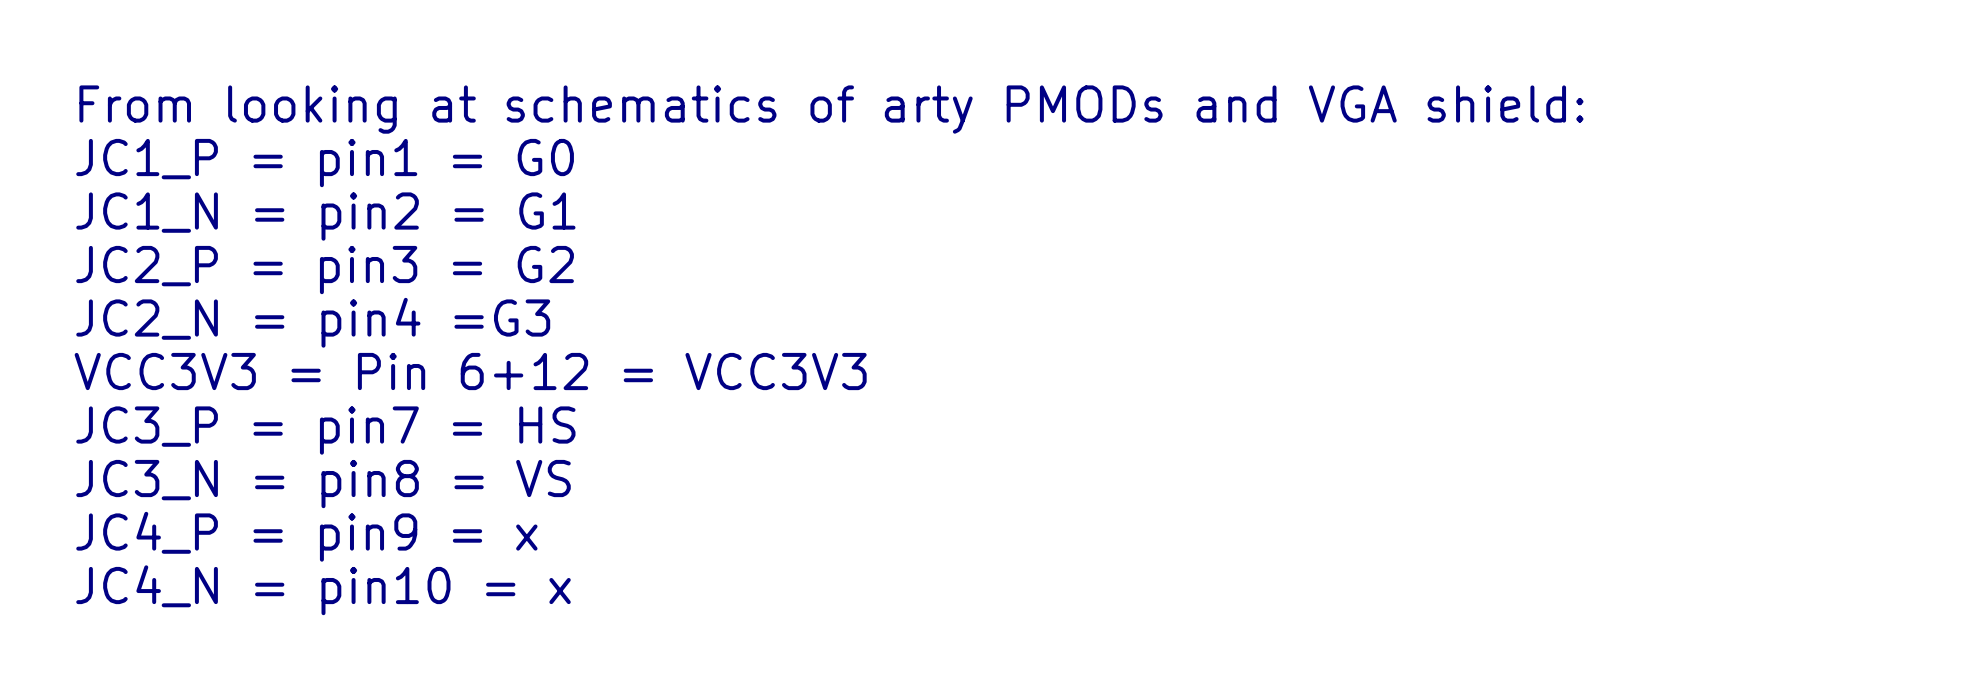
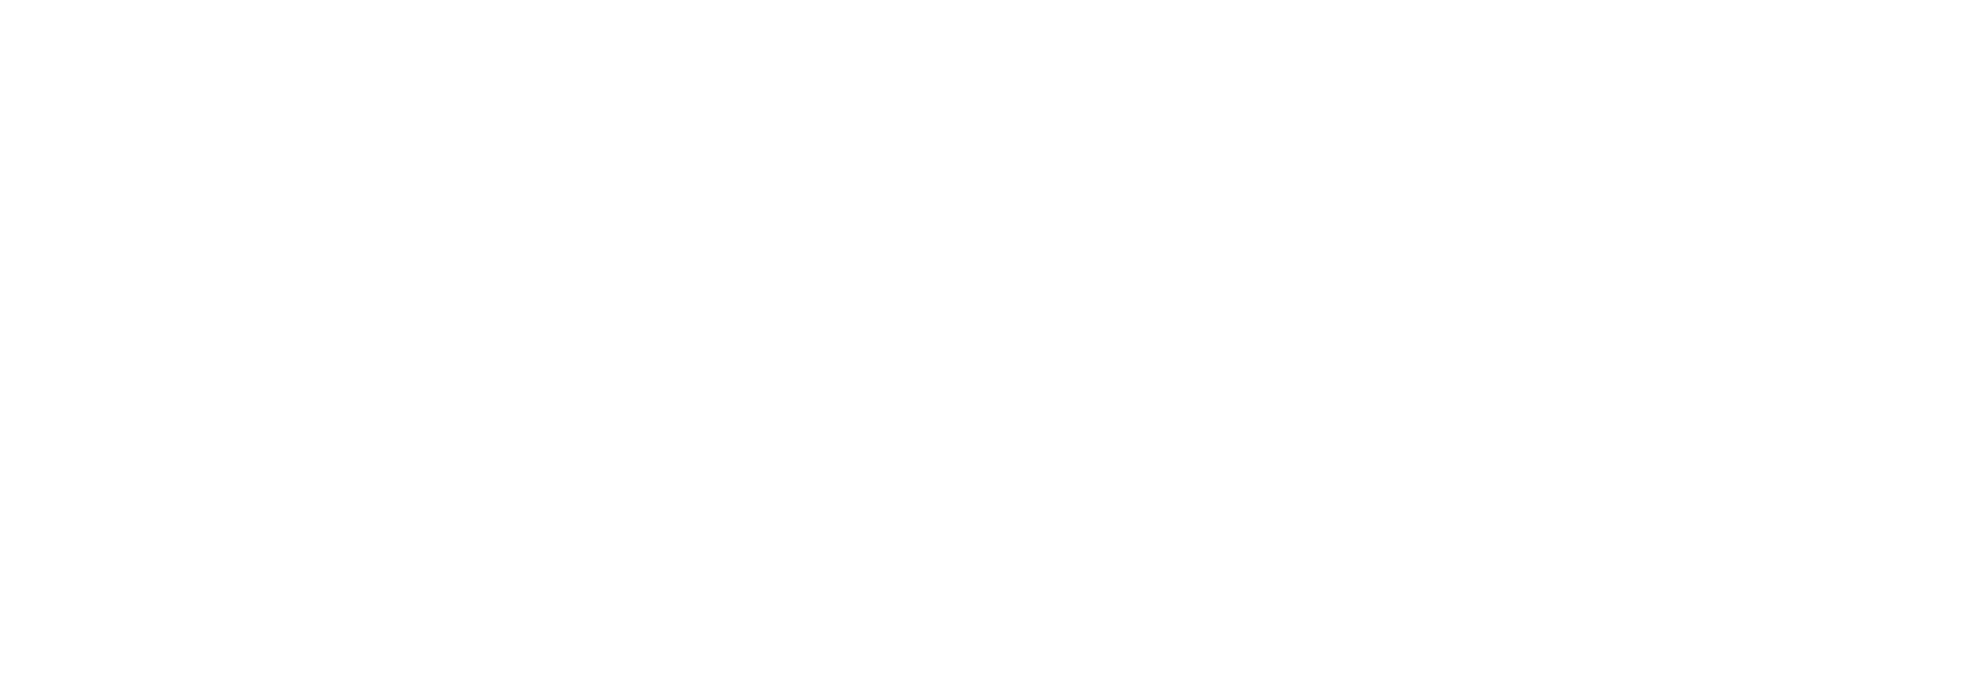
text: From looking at schematics of arty PMODs and VGA shield: (831, 109) -> none
text: JC1_P = pin1 = G0 (325, 163) -> none
text: JC1_N = pin2 = G1 (325, 216) -> none
text: JC2_P = pin3 = G2 (325, 270) -> none
text: JC2_N = pin4 =G3 (313, 322) -> none
text: VCC3V3 = Pin 6+12 = VCC3V3 (470, 371) -> none
text: JC3_P = pin7 = HS (325, 430) -> none
text: JC3_N = pin8 = VS (323, 484) -> none
text: JC4_P = pin9 = x (306, 536) -> none
text: JC4_N = pin10 = x (323, 590) -> none

